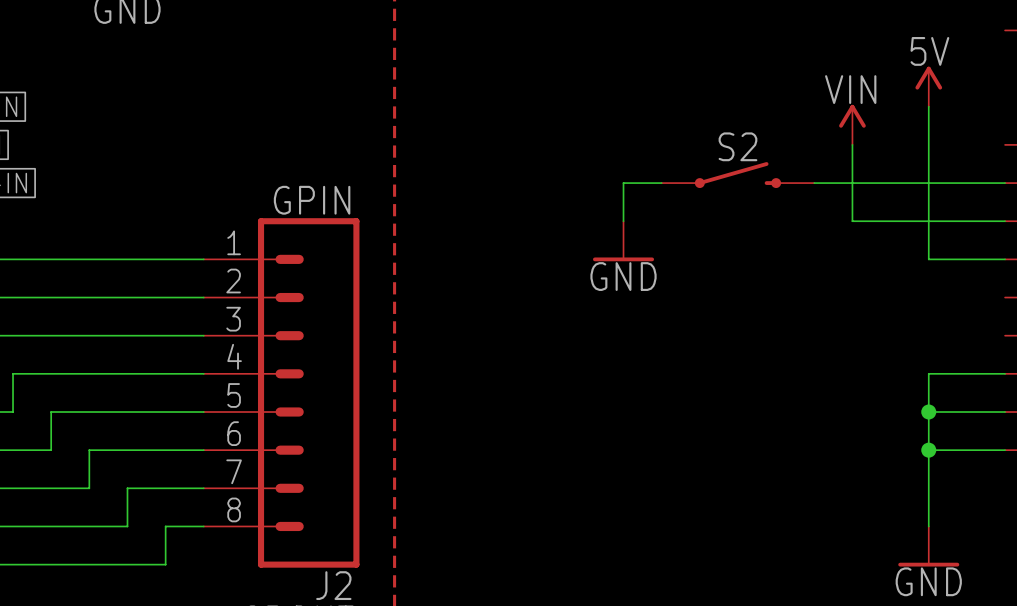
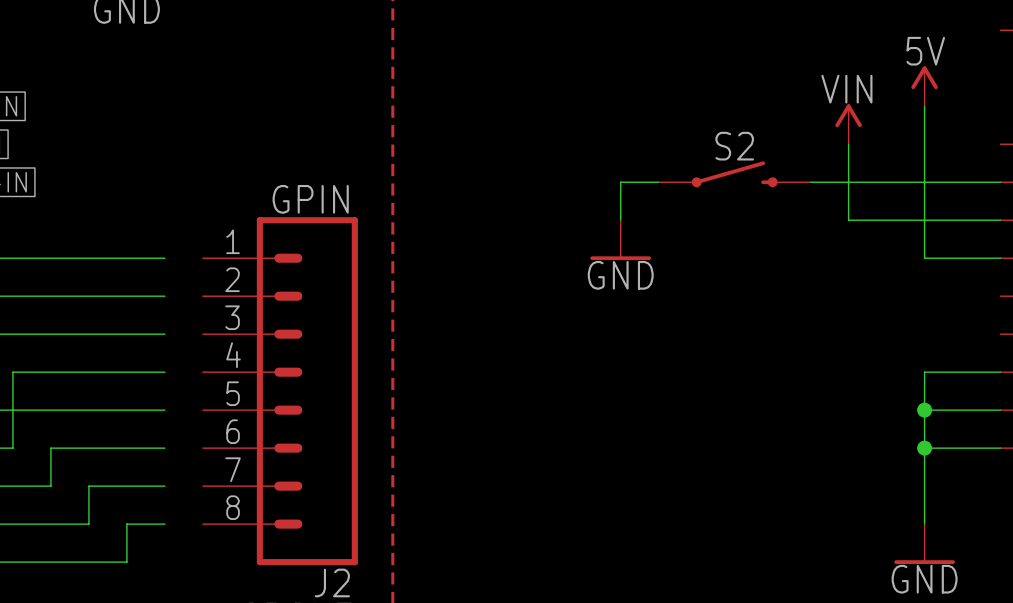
wire: (165, 259) (203, 259) -> none
wire: (165, 297) (203, 297) -> none
wire: (165, 335) (203, 335) -> none
wire: (165, 373) (203, 373) -> none
wire: (51, 412) (51, 450) (13, 450) -> (50, 410) (12, 410) (12, 448)
wire: (165, 412) (203, 412) -> none
wire: (89, 450) (89, 488) (51, 488) -> (88, 448) (50, 448) (50, 486)
wire: (165, 450) (203, 450) -> none
wire: (127, 488) (127, 526) (89, 526) -> (126, 486) (88, 486) (88, 524)
wire: (165, 488) (203, 488) -> none
wire: (203, 526) (165, 526) (165, 564) (127, 564) -> (164, 524) (126, 524) (126, 562)

